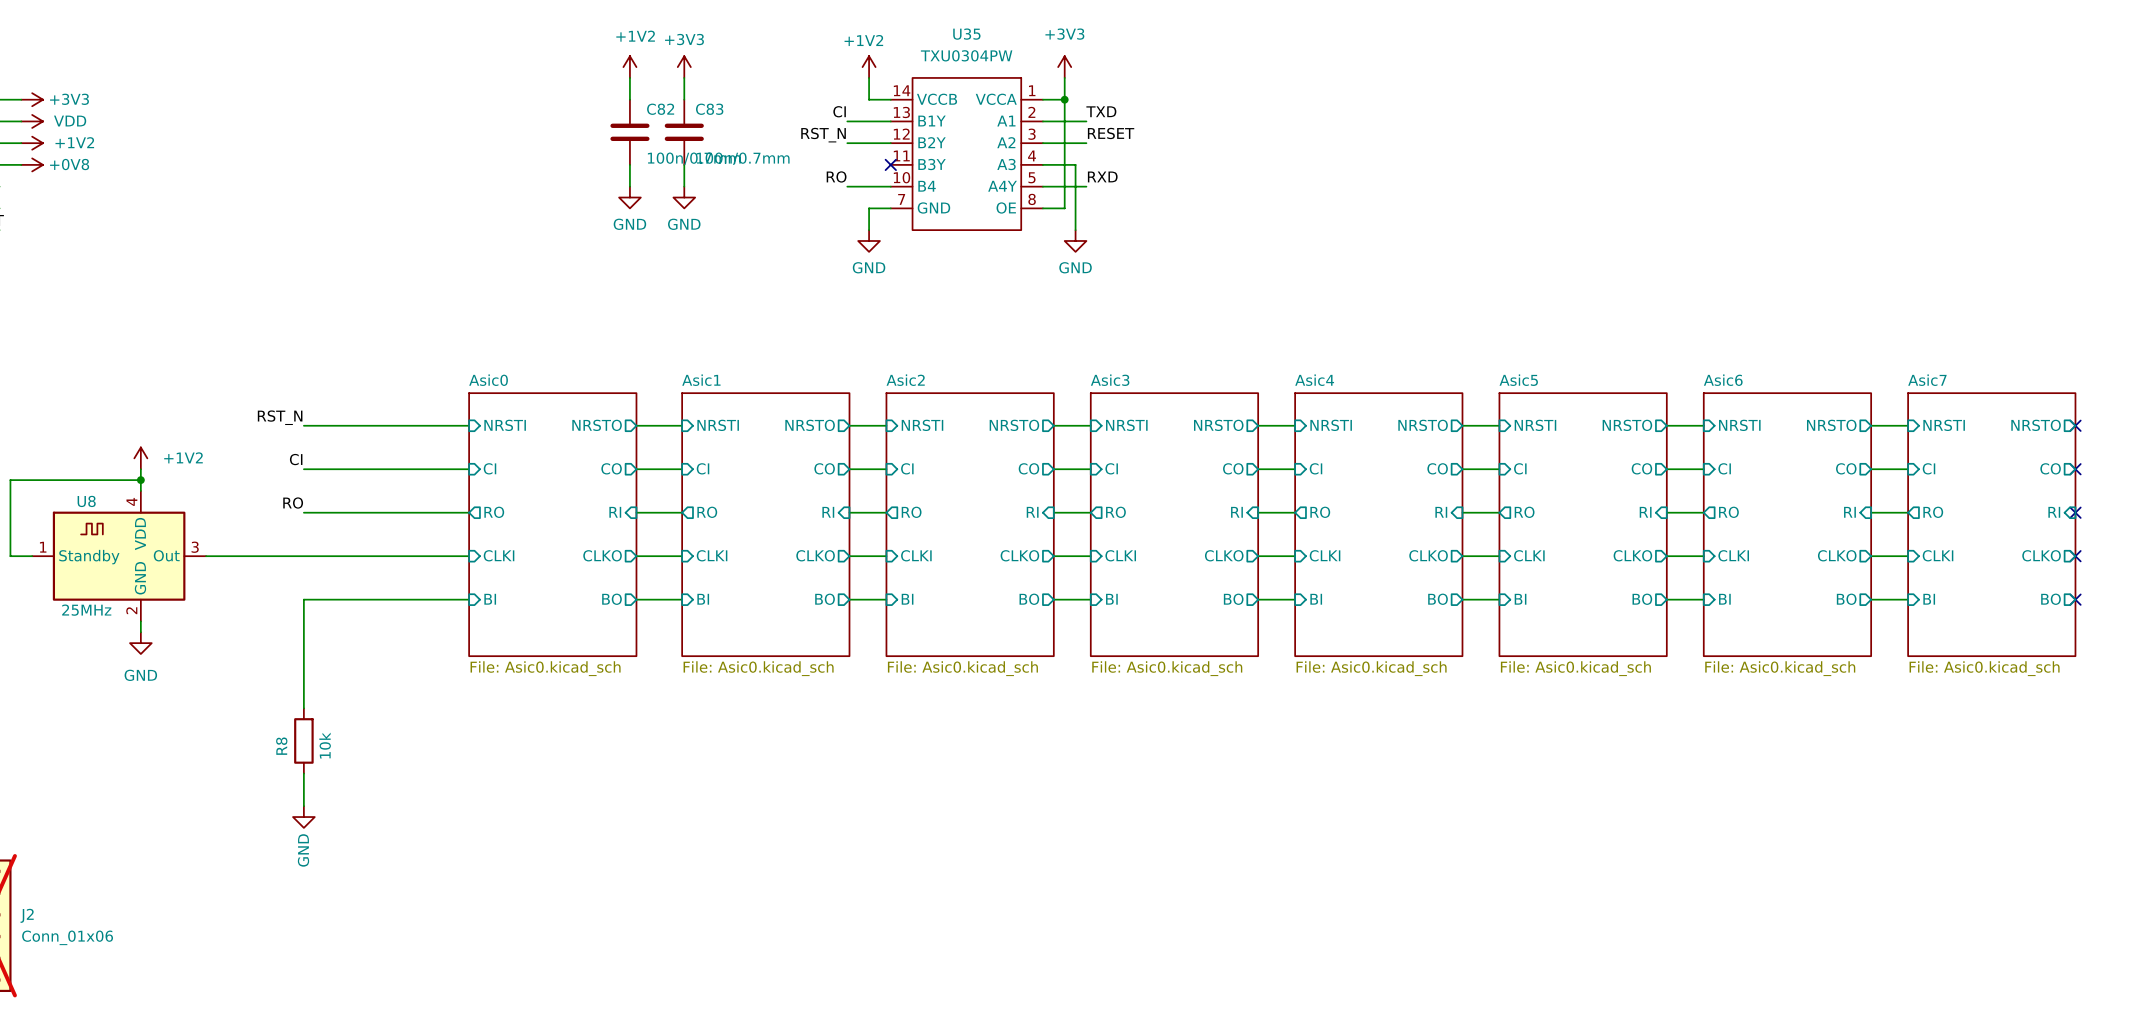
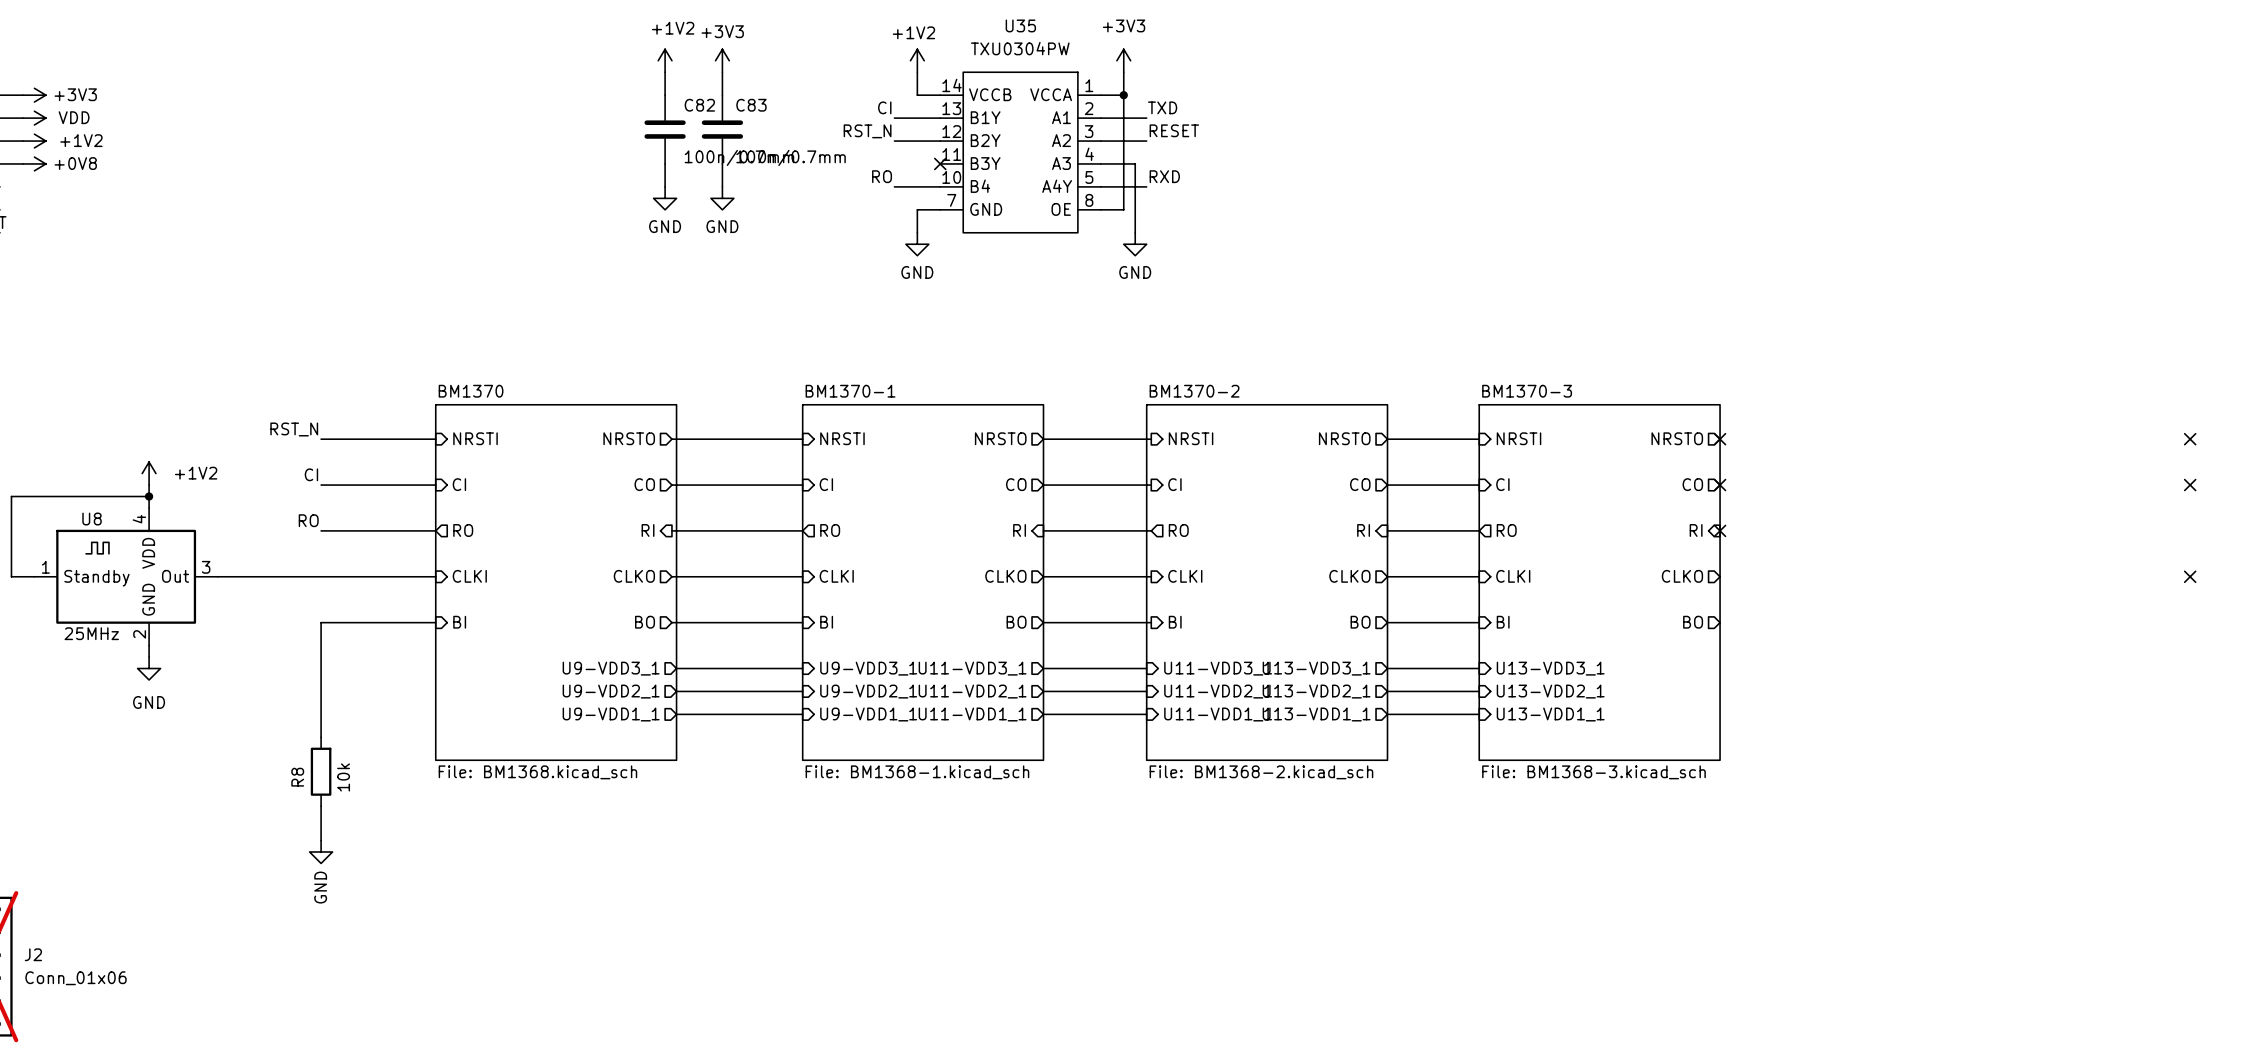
wire: (412, 425) (469, 425) -> none
sheet pin position: NRSTI (505, 425) -> NRSTI (475, 438)
wire: none -> (720, 439) (802, 439)
sheet pin: NRSTI (718, 425) -> none
sheet pin shape: output (810, 425) -> input (842, 438)
sheet pin: NRSTO (810, 425) -> NRSTI (842, 438)
wire: (849, 425) (886, 425) -> none
sheet pin: NRSTI (922, 425) -> none
wire: none -> (1043, 439) (1112, 439)
sheet pin position: NRSTO (1014, 425) -> NRSTO (1000, 438)
sheet pin position: NRSTO (1218, 425) -> NRSTO (1344, 438)
wire: (1258, 425) (1295, 425) -> none
wire: none -> (1387, 439) (1479, 439)
sheet pin: NRSTI (1331, 425) -> none
sheet pin shape: output (1423, 425) -> input (1519, 438)
sheet pin: NRSTO (1423, 425) -> NRSTI (1519, 438)
wire: (1462, 425) (1499, 425) -> none
sheet pin: NRSTI (1535, 425) -> none
sheet pin position: NRSTO (1627, 425) -> NRSTO (1677, 438)
no-connect mark: none -> (1720, 439)
wire: (1666, 425) (1703, 425) -> none
sheet pin: NRSTI (1739, 425) -> none
sheet pin: NRSTO (1831, 425) -> none
wire: (1871, 425) (1908, 425) -> none
sheet pin: NRSTI (1944, 425) -> none
sheet pin: NRSTO (2036, 425) -> none
sheet pin position: CI (489, 468) -> CI (459, 484)
sheet pin: CI (703, 468) -> none
sheet pin: none -> CI (826, 484)
sheet pin: CO (824, 468) -> none
sheet pin: CI (907, 468) -> none
sheet pin position: CO (1028, 468) -> CO (1016, 484)
sheet pin position: CO (1233, 468) -> CO (1360, 484)
sheet pin: CI (1316, 468) -> none
sheet pin: none -> CI (1502, 484)
sheet pin: CO (1437, 468) -> none
sheet pin: CI (1520, 468) -> none
sheet pin position: CO (1641, 468) -> CO (1692, 484)
sheet pin: CI (1724, 468) -> none
sheet pin: CO (1846, 468) -> none
sheet pin: CI (1928, 468) -> none
sheet pin: CO (2050, 468) -> none
wire: (412, 469) (469, 469) -> none
wire: none -> (720, 485) (802, 485)
wire: (849, 469) (886, 469) -> none
wire: none -> (1043, 485) (1112, 485)
wire: (1258, 469) (1295, 469) -> none
wire: none -> (1387, 485) (1479, 485)
wire: (1462, 469) (1499, 469) -> none
no-connect mark: none -> (1720, 485)
wire: (1666, 469) (1703, 469) -> none
wire: (1871, 469) (1908, 469) -> none
wire: (412, 512) (469, 512) -> none
sheet pin position: RO (494, 512) -> RO (463, 530)
wire: none -> (720, 530) (802, 530)
sheet pin: RO (707, 512) -> none
sheet pin: none -> RO (830, 530)
sheet pin: RI (828, 512) -> none
wire: (849, 512) (886, 512) -> none
sheet pin: RO (911, 512) -> none
wire: none -> (1043, 530) (1112, 530)
sheet pin position: RI (1032, 512) -> RI (1019, 530)
sheet pin position: RI (1236, 512) -> RI (1363, 530)
wire: (1258, 512) (1295, 512) -> none
wire: none -> (1387, 530) (1479, 530)
sheet pin: RO (1320, 512) -> none
sheet pin: none -> RO (1506, 530)
sheet pin: RI (1441, 512) -> none
wire: (1462, 512) (1499, 512) -> none
sheet pin: RO (1524, 512) -> none
no-connect mark: none -> (1720, 530)
sheet pin position: RI (1645, 512) -> RI (1696, 530)
wire: (1666, 512) (1703, 512) -> none
sheet pin: RO (1728, 512) -> none
sheet pin: RI (1849, 512) -> none
wire: (1871, 512) (1908, 512) -> none
sheet pin: RO (1933, 512) -> none
sheet pin: RI (2054, 512) -> none
no-connect mark: (2075, 512) -> none
sheet Asic0: File: Asic0.kicad_sch (552, 524) -> none
sheet Asic1: File: Asic0.kicad_sch (765, 524) -> none
sheet Asic2: File: Asic0.kicad_sch (970, 524) -> none
sheet Asic3: File: Asic0.kicad_sch (1174, 524) -> none
sheet Asic4: File: Asic0.kicad_sch (1378, 524) -> none
sheet Asic5: File: Asic0.kicad_sch (1583, 524) -> none
sheet Asic6: File: Asic0.kicad_sch (1787, 524) -> none
sheet Asic7: File: Asic0.kicad_sch (1991, 524) -> none
sheet pin position: CLKI (499, 555) -> CLKI (469, 576)
sheet pin: CLKI (712, 555) -> none
sheet pin shape: output (815, 555) -> input (836, 576)
sheet pin: CLKO (815, 555) -> CLKI (836, 576)
sheet pin: CLKI (916, 555) -> none
sheet pin position: CLKO (1019, 555) -> CLKO (1005, 576)
sheet pin position: CLKO (1224, 555) -> CLKO (1349, 576)
sheet pin: CLKI (1325, 555) -> none
sheet pin shape: output (1428, 555) -> input (1513, 576)
sheet pin: CLKO (1428, 555) -> CLKI (1513, 576)
sheet pin: CLKI (1529, 555) -> none
sheet pin position: CLKO (1632, 555) -> CLKO (1682, 576)
sheet pin: CLKI (1733, 555) -> none
sheet pin: CLKO (1837, 555) -> none
sheet pin: CLKI (1938, 555) -> none
sheet pin: CLKO (2041, 555) -> none
wire: (412, 556) (469, 556) -> none
wire: none -> (720, 576) (802, 576)
wire: (849, 556) (886, 556) -> none
wire: none -> (1043, 576) (1112, 576)
wire: (1258, 556) (1295, 556) -> none
wire: none -> (1387, 576) (1479, 576)
wire: (1462, 556) (1499, 556) -> none
wire: (1666, 556) (1703, 556) -> none
wire: (1871, 556) (1908, 556) -> none
sheet BM1370: none -> File: BM1368.kicad_sch (556, 582)
sheet BM1370-1: none -> File: BM1368-1.kicad_sch (923, 582)
sheet BM1370-2: none -> File: BM1368-2.kicad_sch (1267, 582)
sheet BM1370-3: none -> File: BM1368-3.kicad_sch (1599, 582)
wire: (412, 599) (469, 599) -> none
sheet pin position: BI (490, 599) -> BI (459, 622)
wire: none -> (720, 622) (802, 622)
sheet pin: BI (703, 599) -> none
sheet pin: none -> BI (826, 622)
sheet pin: BO (825, 599) -> none
wire: (849, 599) (886, 599) -> none
sheet pin: BI (907, 599) -> none
wire: none -> (1043, 622) (1112, 622)
sheet pin position: BO (1029, 599) -> BO (1016, 622)
sheet pin position: BO (1233, 599) -> BO (1360, 622)
wire: (1258, 599) (1295, 599) -> none
wire: none -> (1387, 622) (1479, 622)
sheet pin: BI (1316, 599) -> none
sheet pin: none -> BI (1503, 622)
sheet pin: BO (1438, 599) -> none
wire: (1462, 599) (1499, 599) -> none
sheet pin: BI (1520, 599) -> none
sheet pin position: BO (1642, 599) -> BO (1693, 622)
wire: (1666, 599) (1703, 599) -> none
sheet pin: BI (1724, 599) -> none
sheet pin: BO (1846, 599) -> none
wire: (1871, 599) (1908, 599) -> none
sheet pin: BI (1929, 599) -> none
sheet pin: BO (2051, 599) -> none
no-connect mark: (2075, 599) -> none
wire: none -> (676, 668) (802, 668)
wire: none -> (1043, 668) (1146, 668)
wire: none -> (1387, 668) (1479, 668)
sheet pin: none -> U9-VDD3_1 (611, 668)
sheet pin: none -> U9-VDD3_1 (868, 668)
sheet pin: none -> U11-VDD3_1 (972, 668)
sheet pin: none -> U11-VDD3_1 (1218, 668)
sheet pin: none -> U13-VDD3_1 (1316, 668)
sheet pin: none -> U13-VDD3_1 (1550, 668)
wire: none -> (676, 691) (802, 691)
wire: none -> (1043, 691) (1146, 691)
wire: none -> (1387, 691) (1479, 691)
sheet pin: none -> U9-VDD2_1 (611, 691)
sheet pin: none -> U9-VDD2_1 (868, 691)
sheet pin: none -> U11-VDD2_1 (972, 691)
sheet pin: none -> U11-VDD2_1 (1218, 691)
sheet pin: none -> U13-VDD2_1 (1316, 691)
sheet pin: none -> U13-VDD2_1 (1550, 691)
wire: none -> (676, 714) (802, 714)
wire: none -> (1043, 714) (1146, 714)
wire: none -> (1387, 714) (1479, 714)
sheet pin: none -> U9-VDD1_1 (611, 714)
sheet pin: none -> U9-VDD1_1 (868, 714)
sheet pin: none -> U11-VDD1_1 (972, 714)
sheet pin: none -> U11-VDD1_1 (1218, 714)
sheet pin: none -> U13-VDD1_1 (1316, 714)
sheet pin: none -> U13-VDD1_1 (1550, 714)

